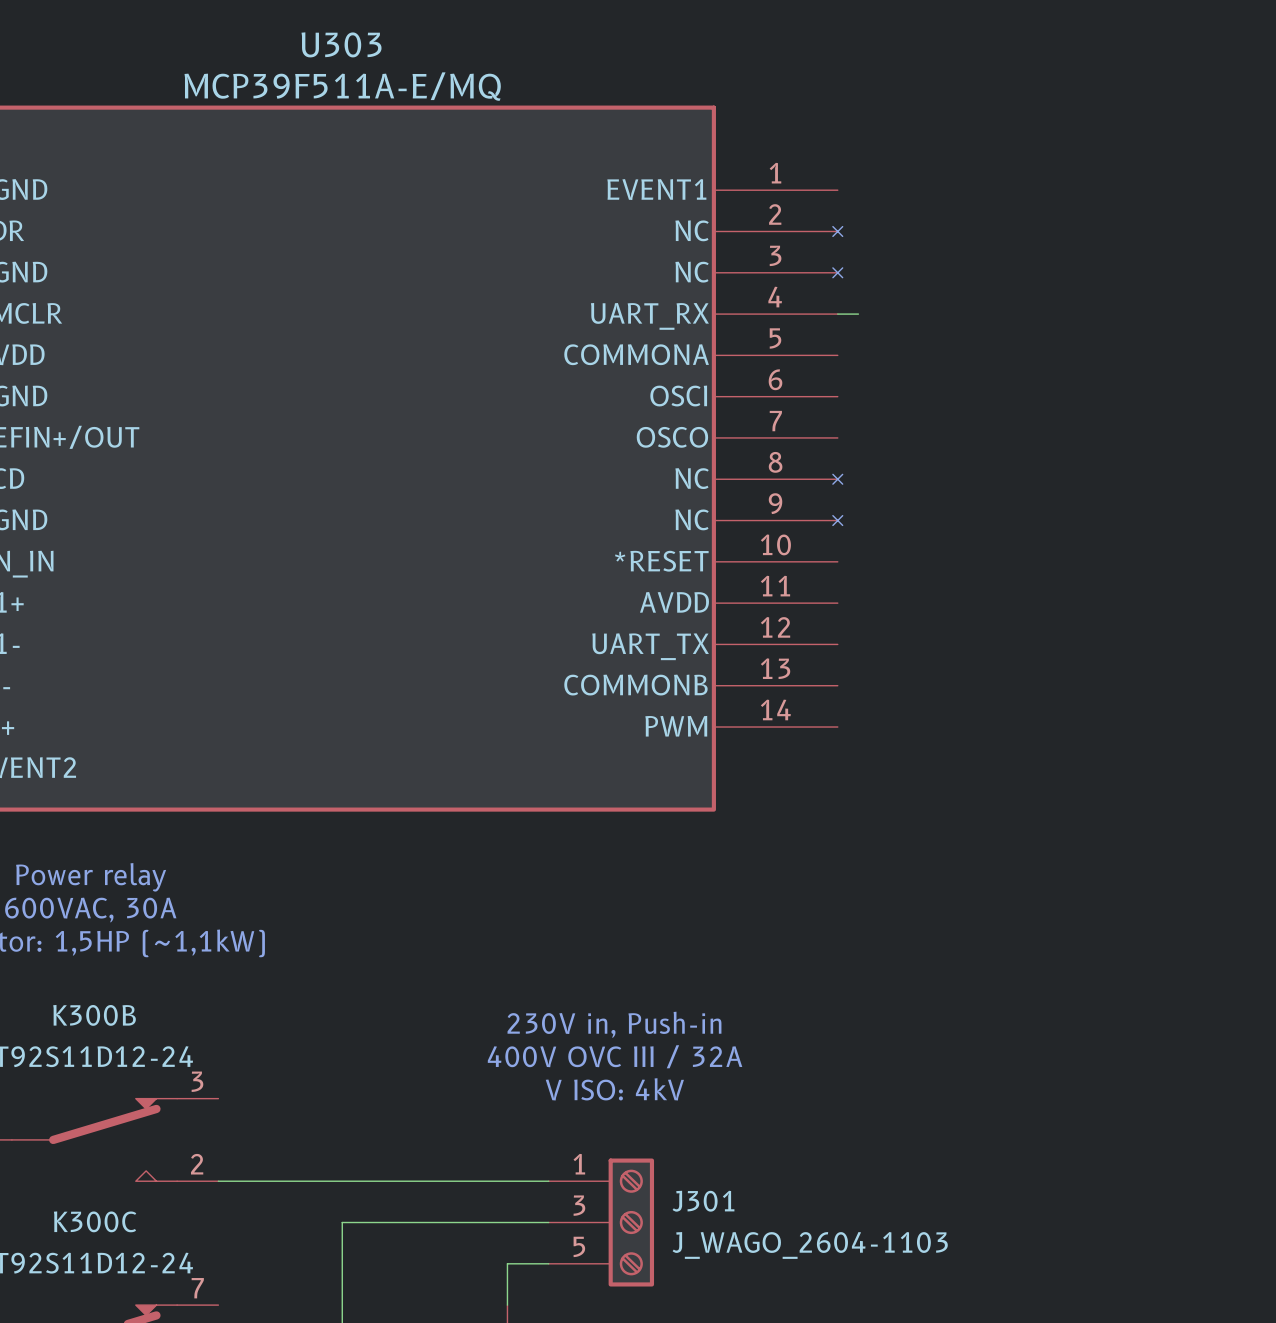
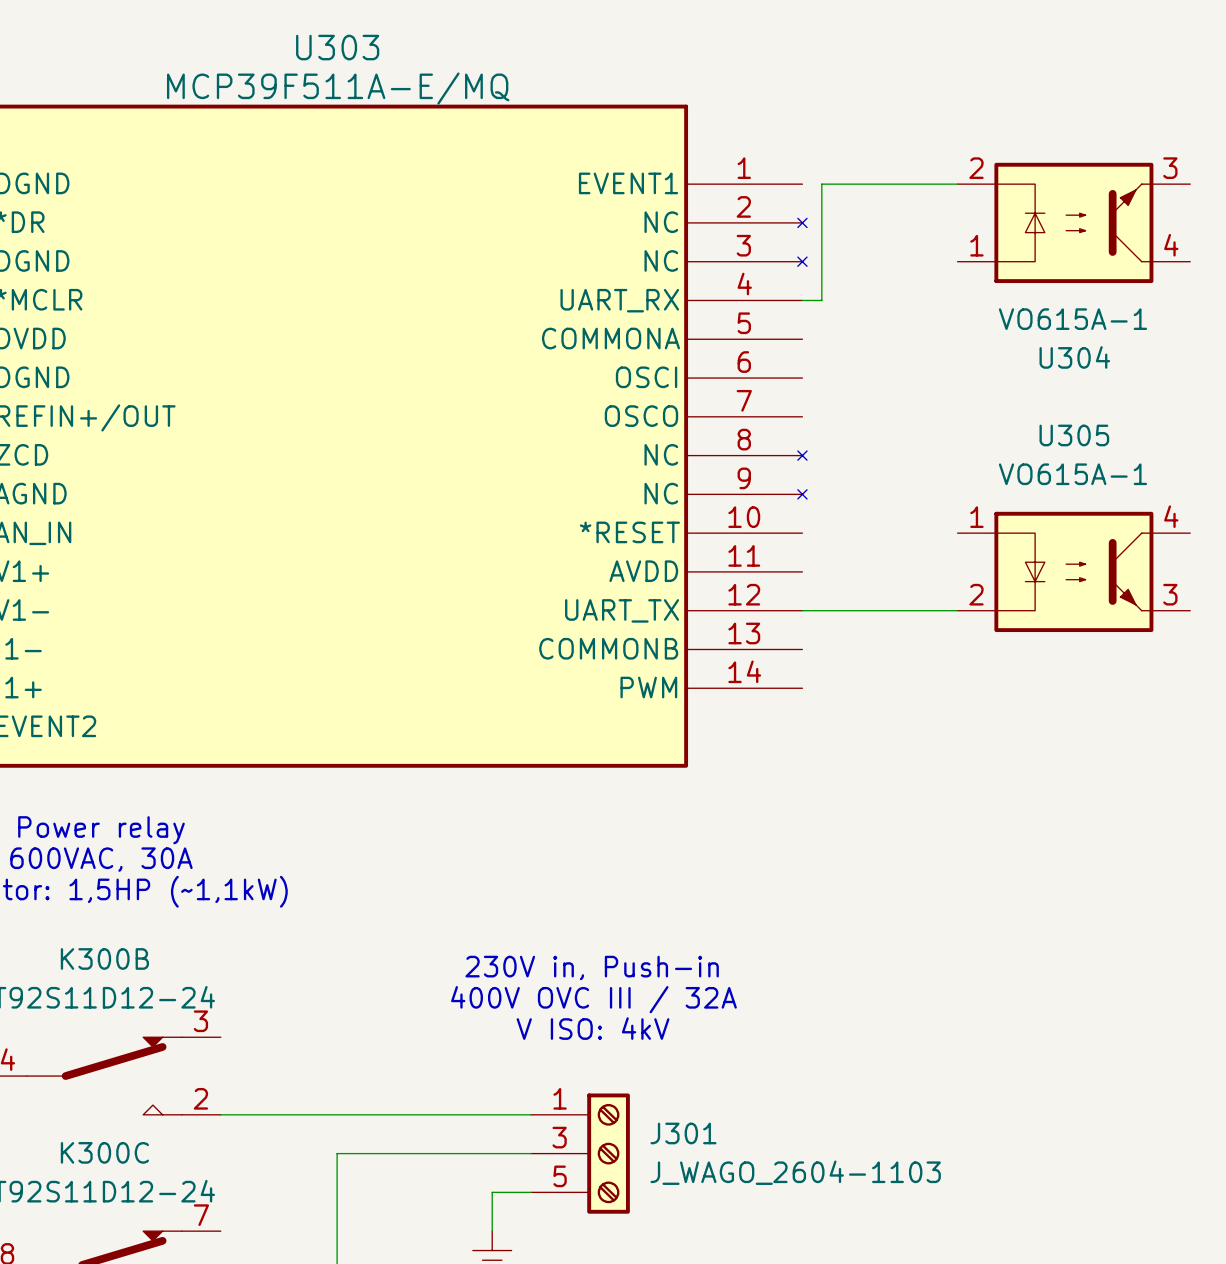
wire: none -> (957, 184) (821, 184) (821, 300)
U304: none -> VO615A-1 (1073, 222)
U305: none -> VO615A-1 (1073, 571)
wire: none -> (802, 610) (957, 610)

